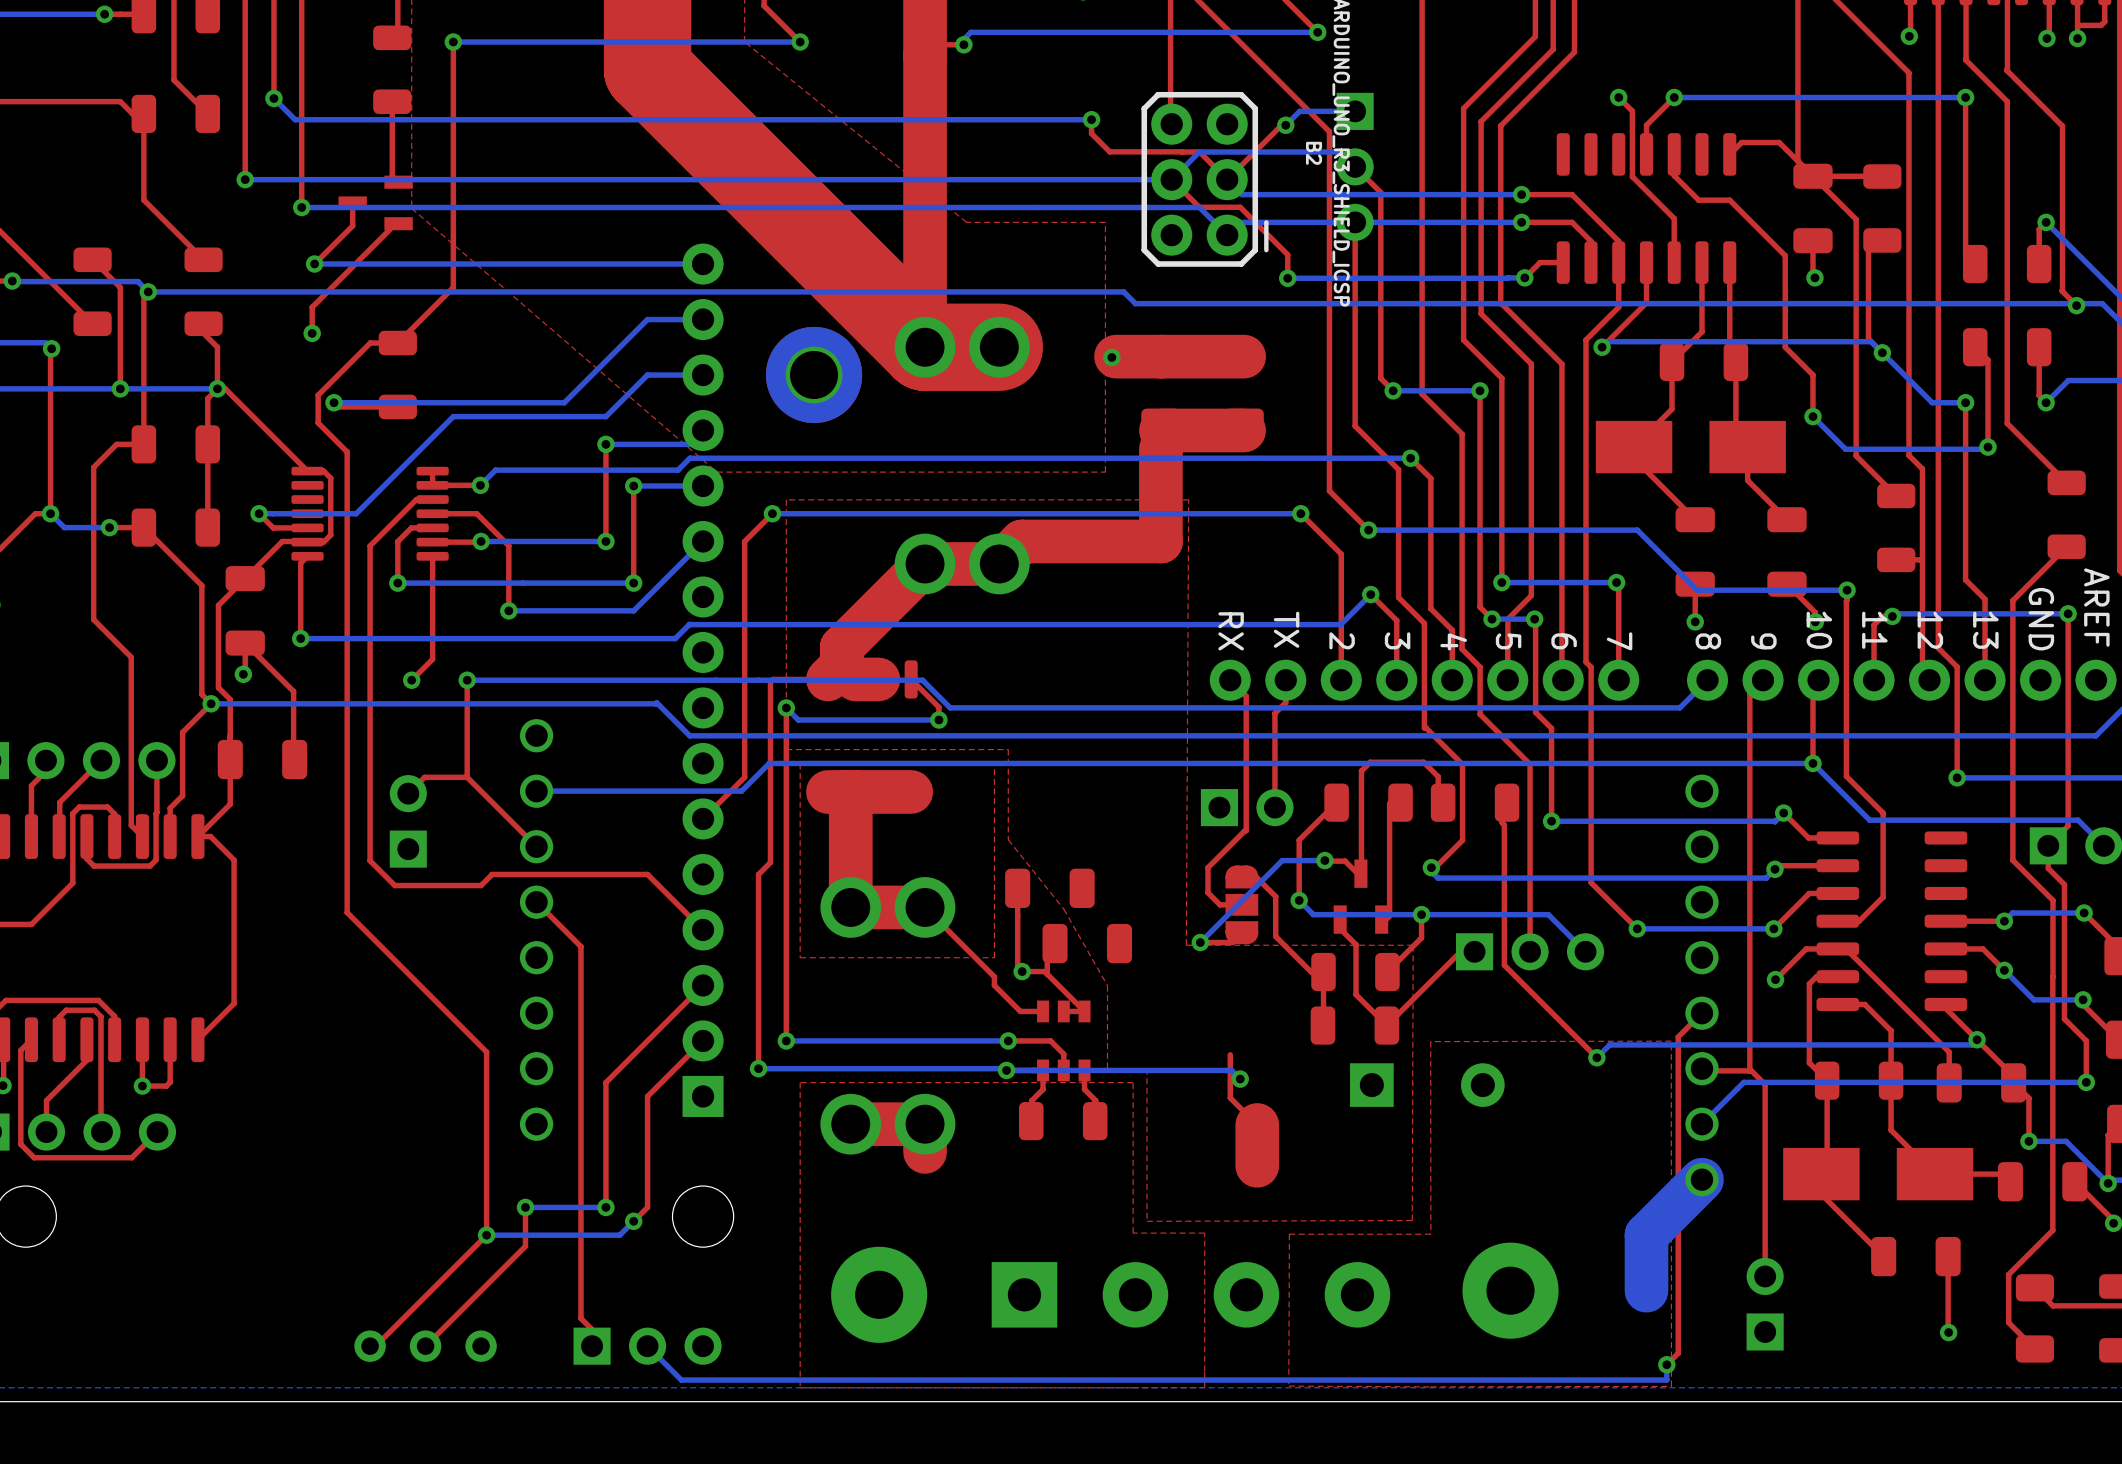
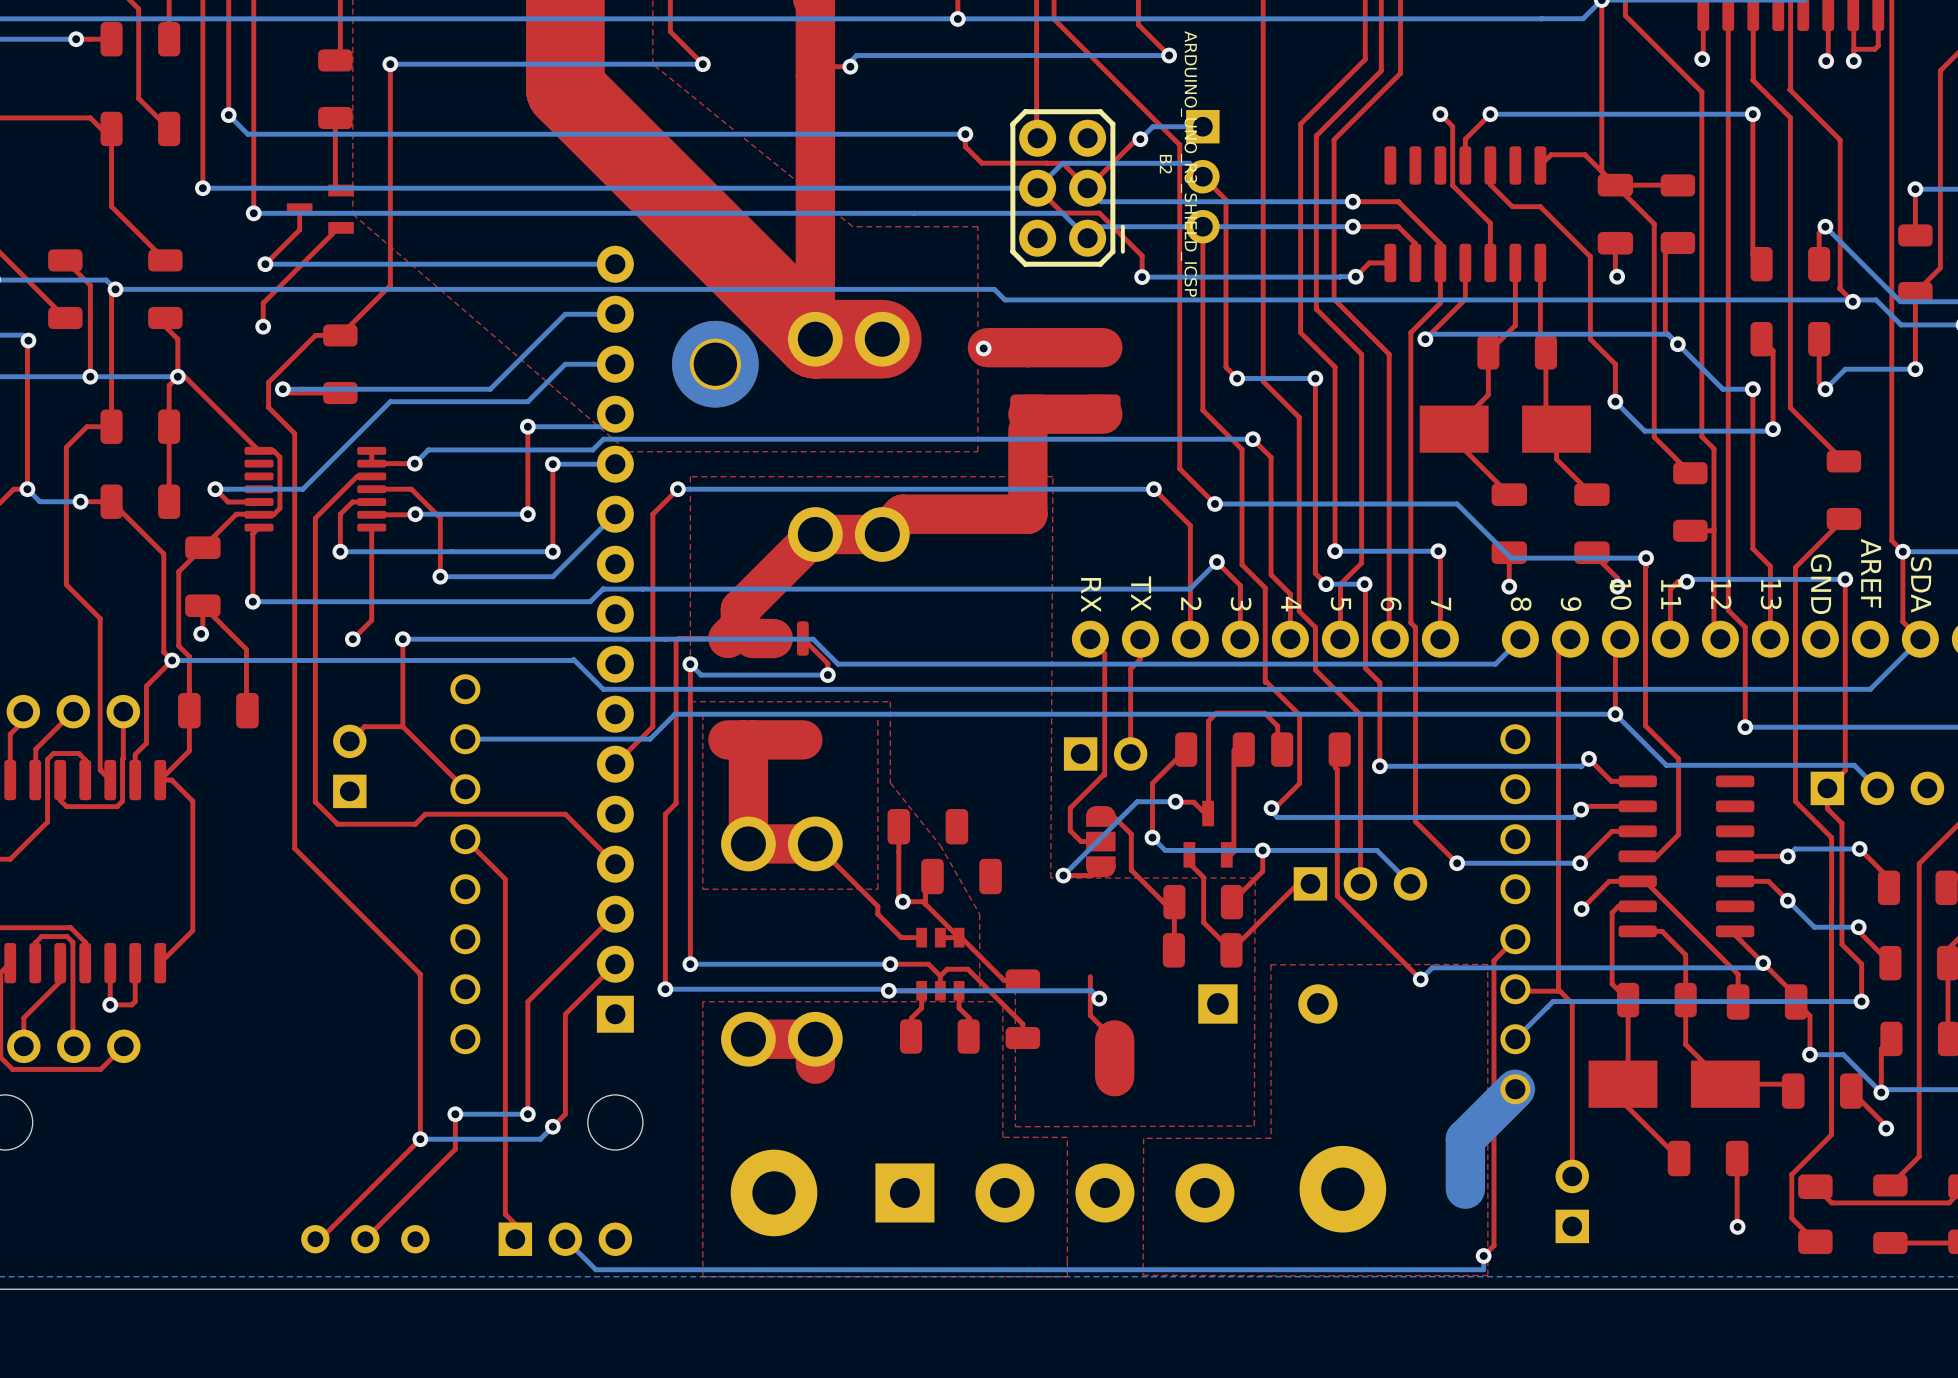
top track: none -> (959, 937) (961, 937) (1004, 980) (1022, 980)
top track: none -> (940, 976) (947, 969) (967, 969) (1022, 1024) (1022, 1038)
part: none -> (1022, 1009)

